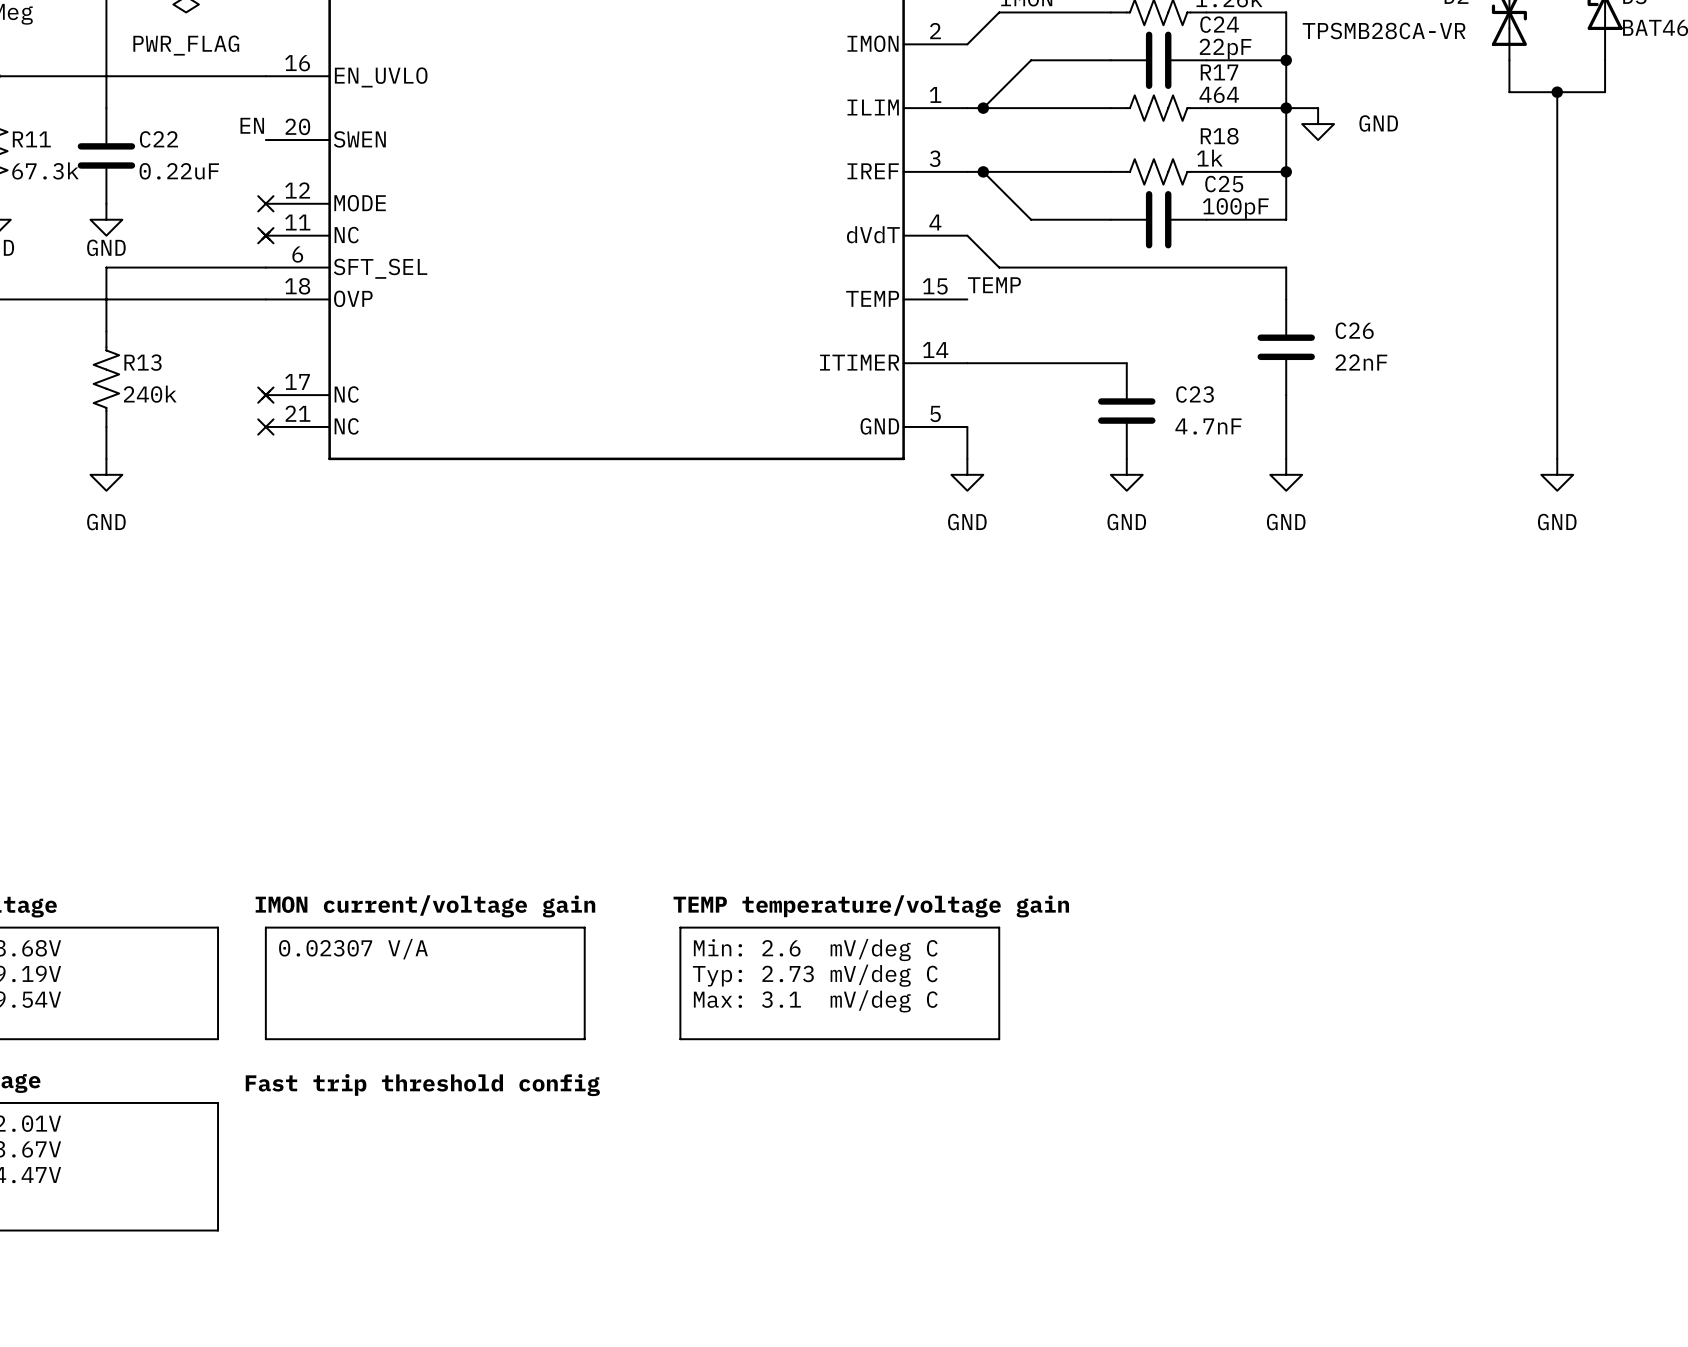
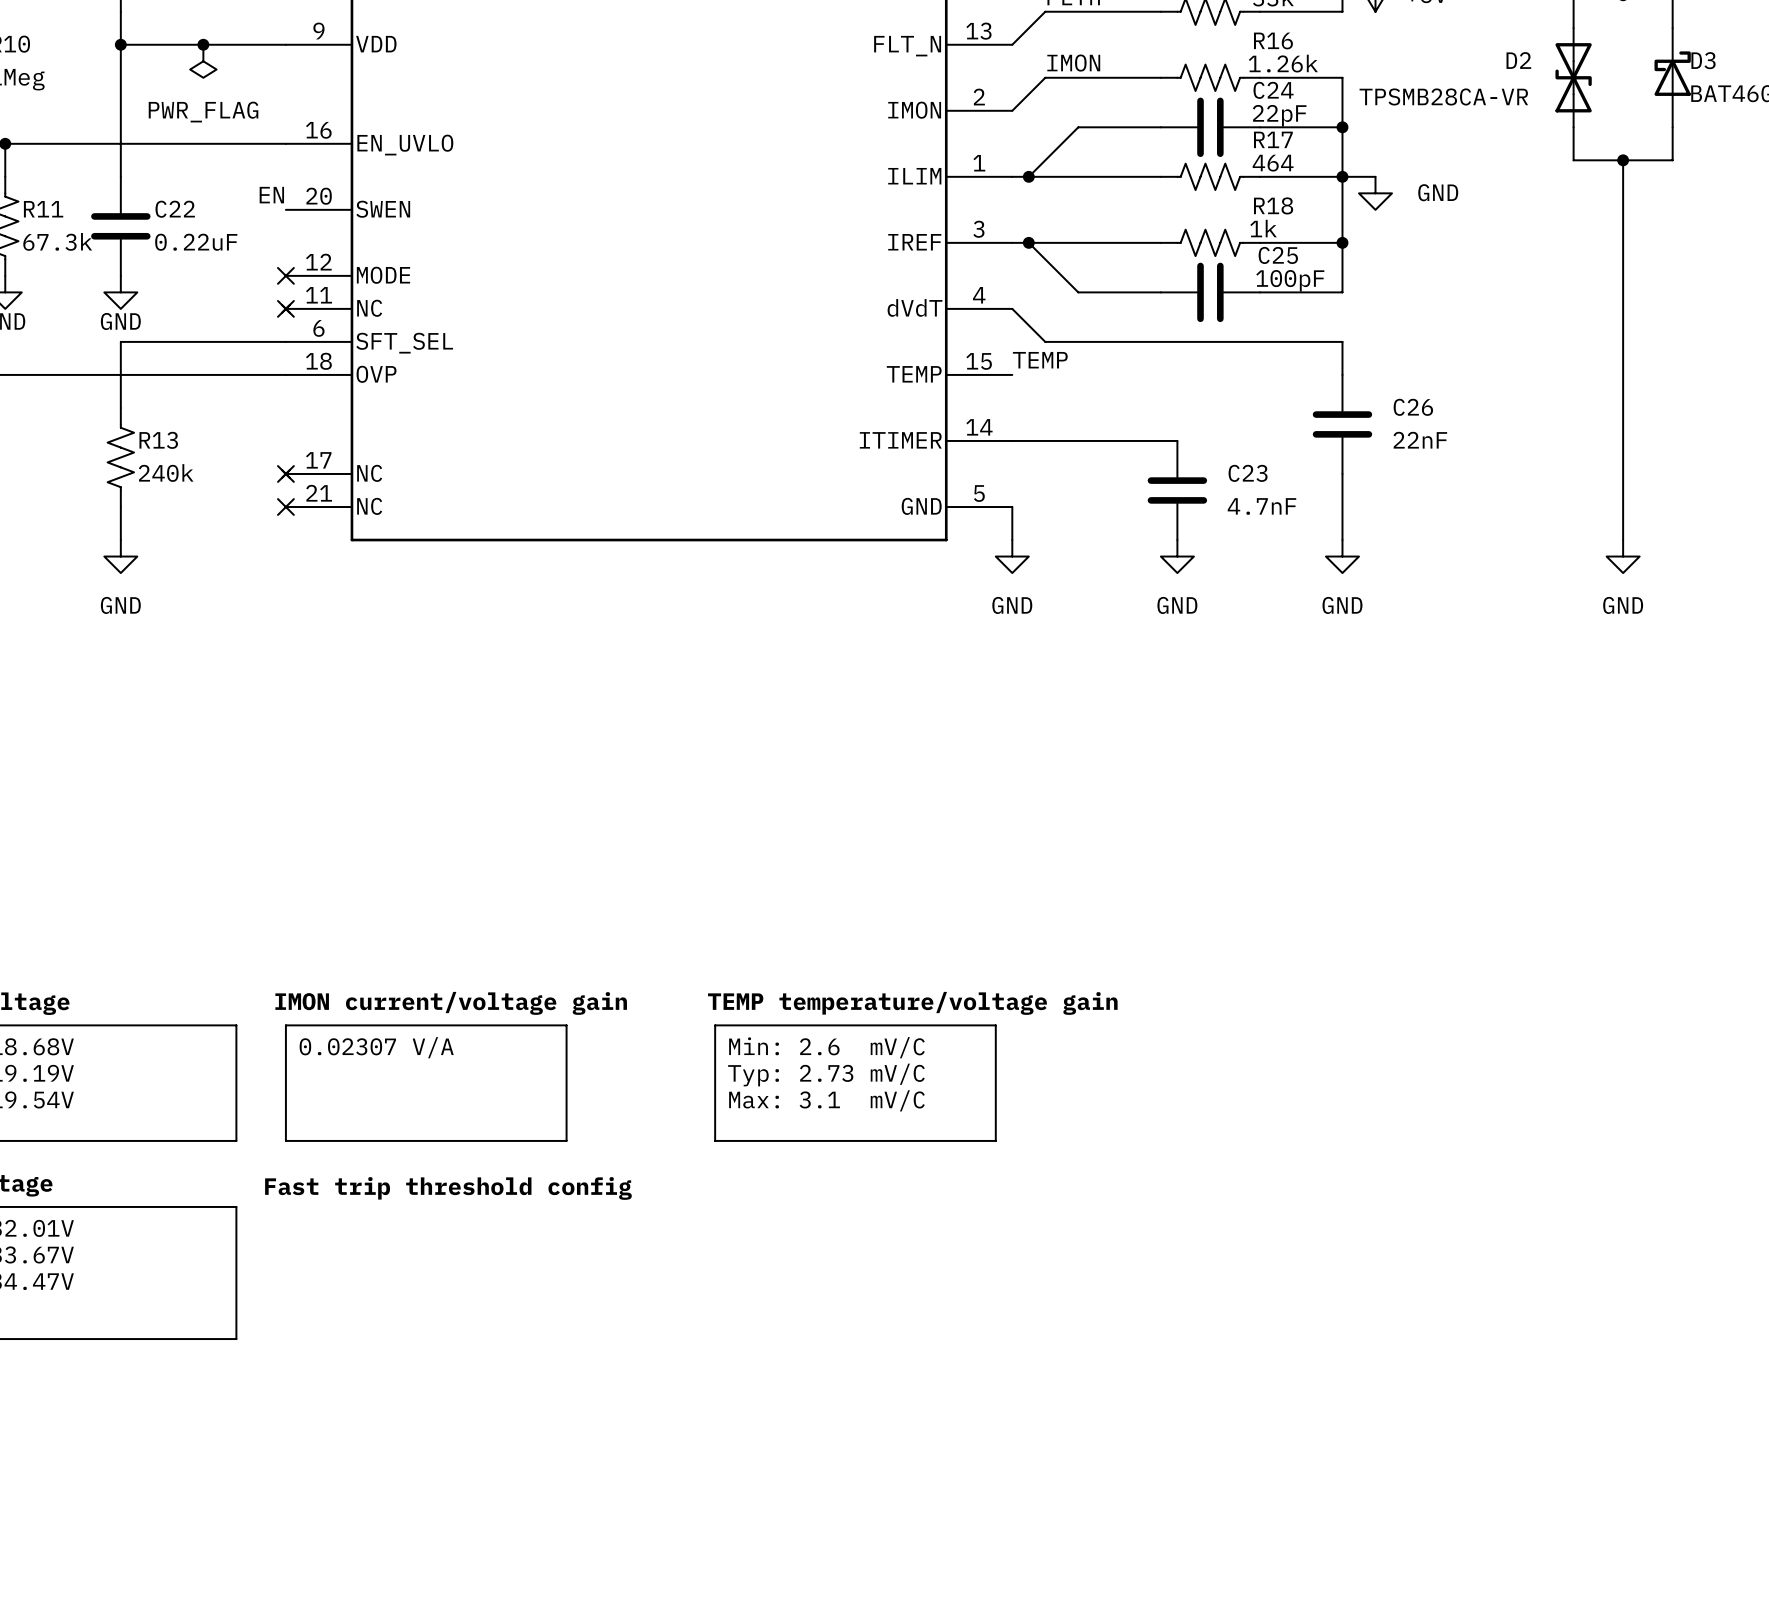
line: (536, 927) (584, 927) (584, 1039) (536, 1039) -> (566, 1025) (566, 1140)
line: (951, 927) (999, 927) (999, 1039) (951, 1039) -> (995, 1025) (995, 1140)
text: Min: 2.6 mV/deg C (815, 950) -> Min: 2.6 mV/C (826, 1047)
text: Typ: 2.73 mV/deg C (815, 975) -> Typ: 2.73 mV/C (826, 1075)
text: Max: 3.1 mV/deg C (815, 1001) -> Max: 3.1 mV/C (826, 1100)

